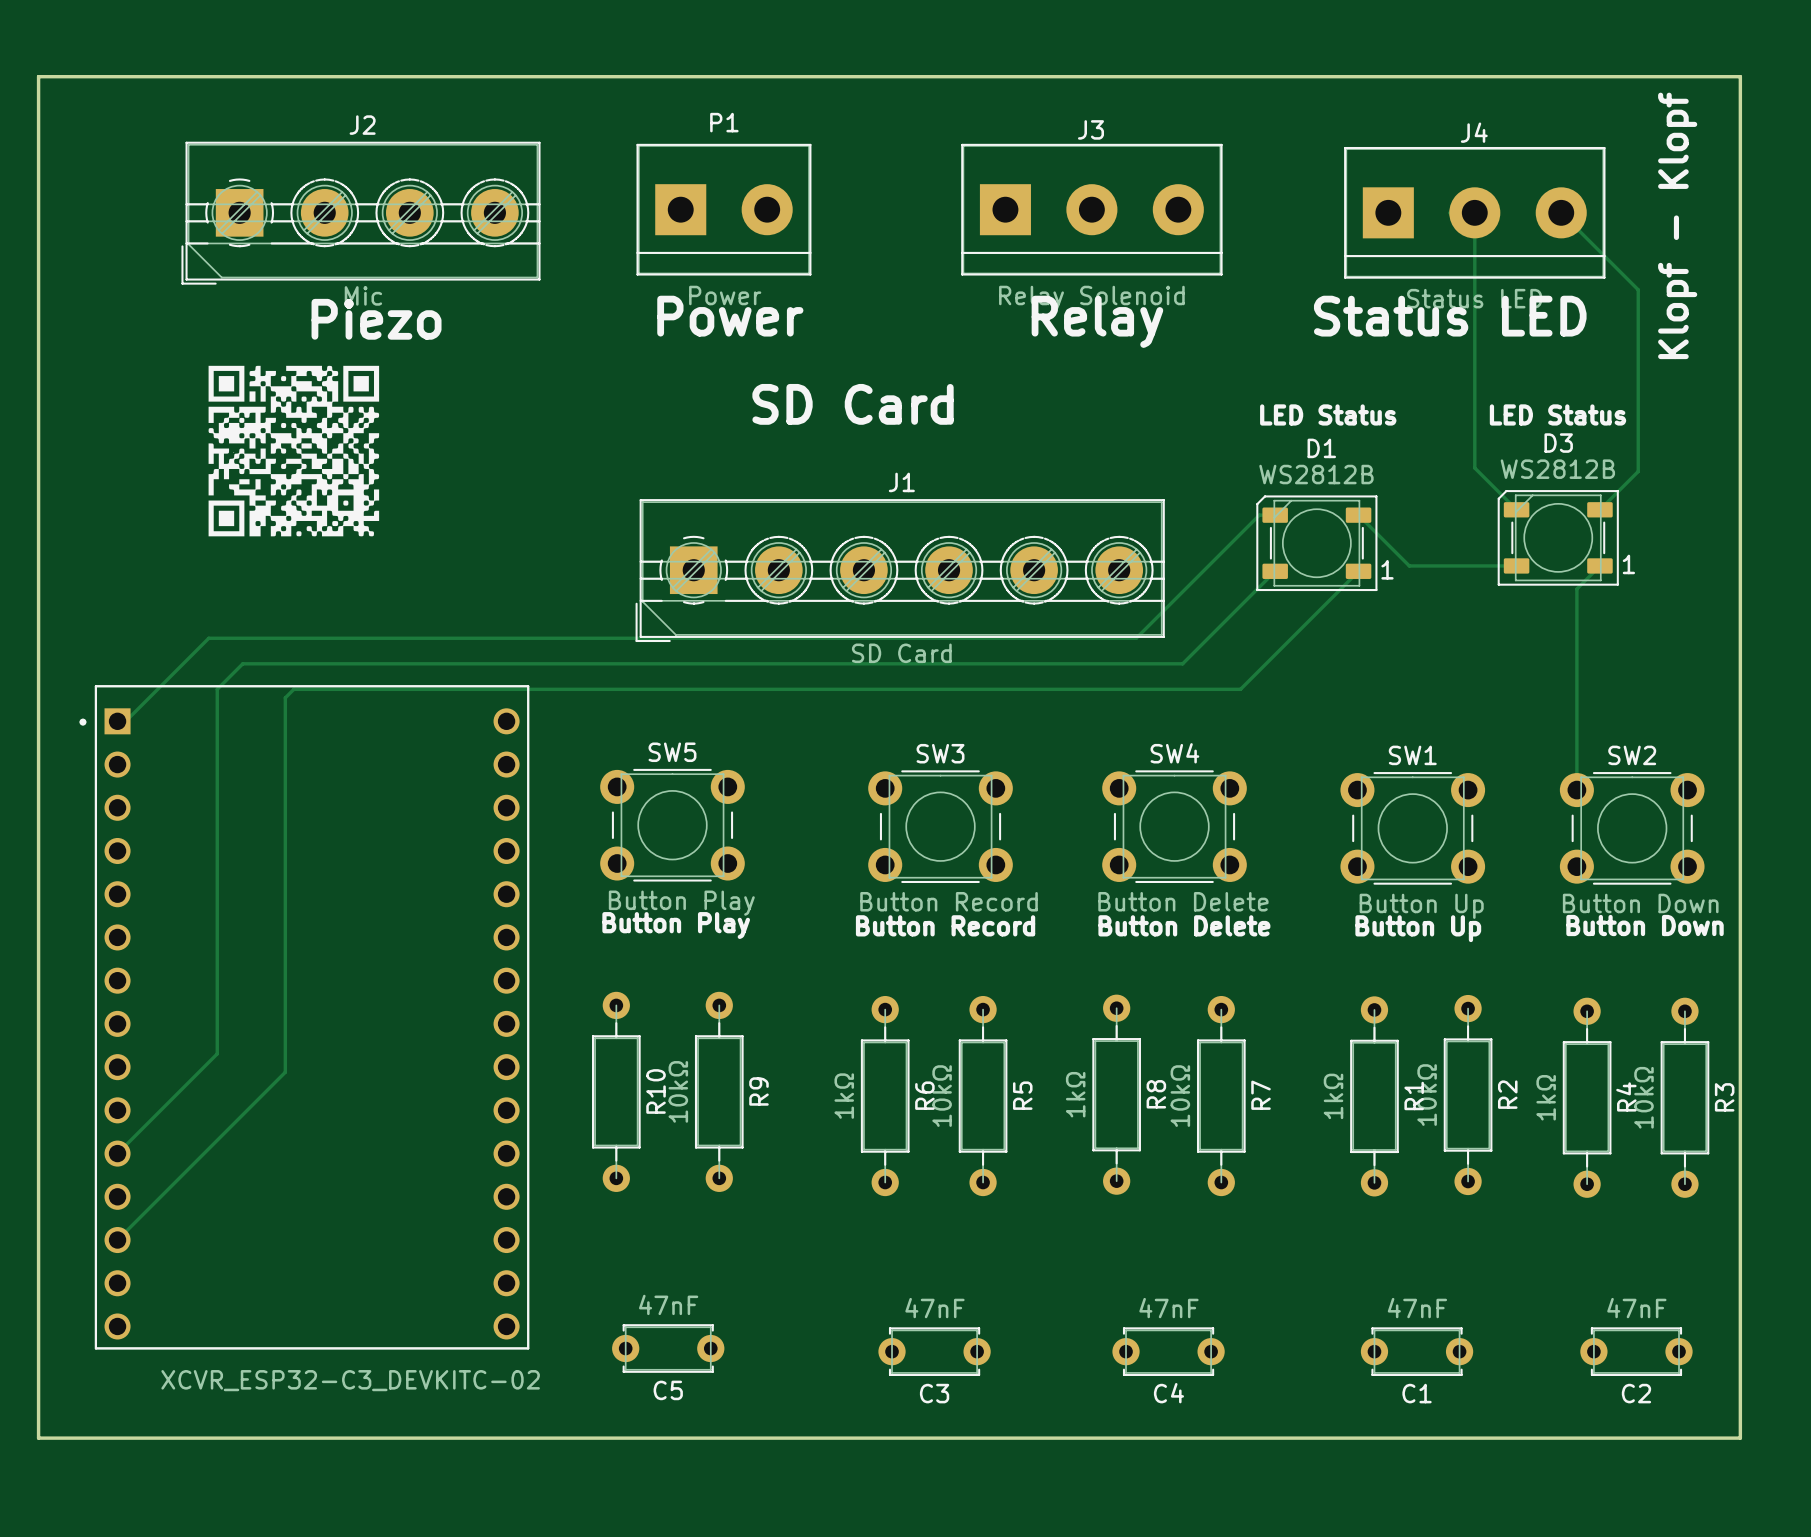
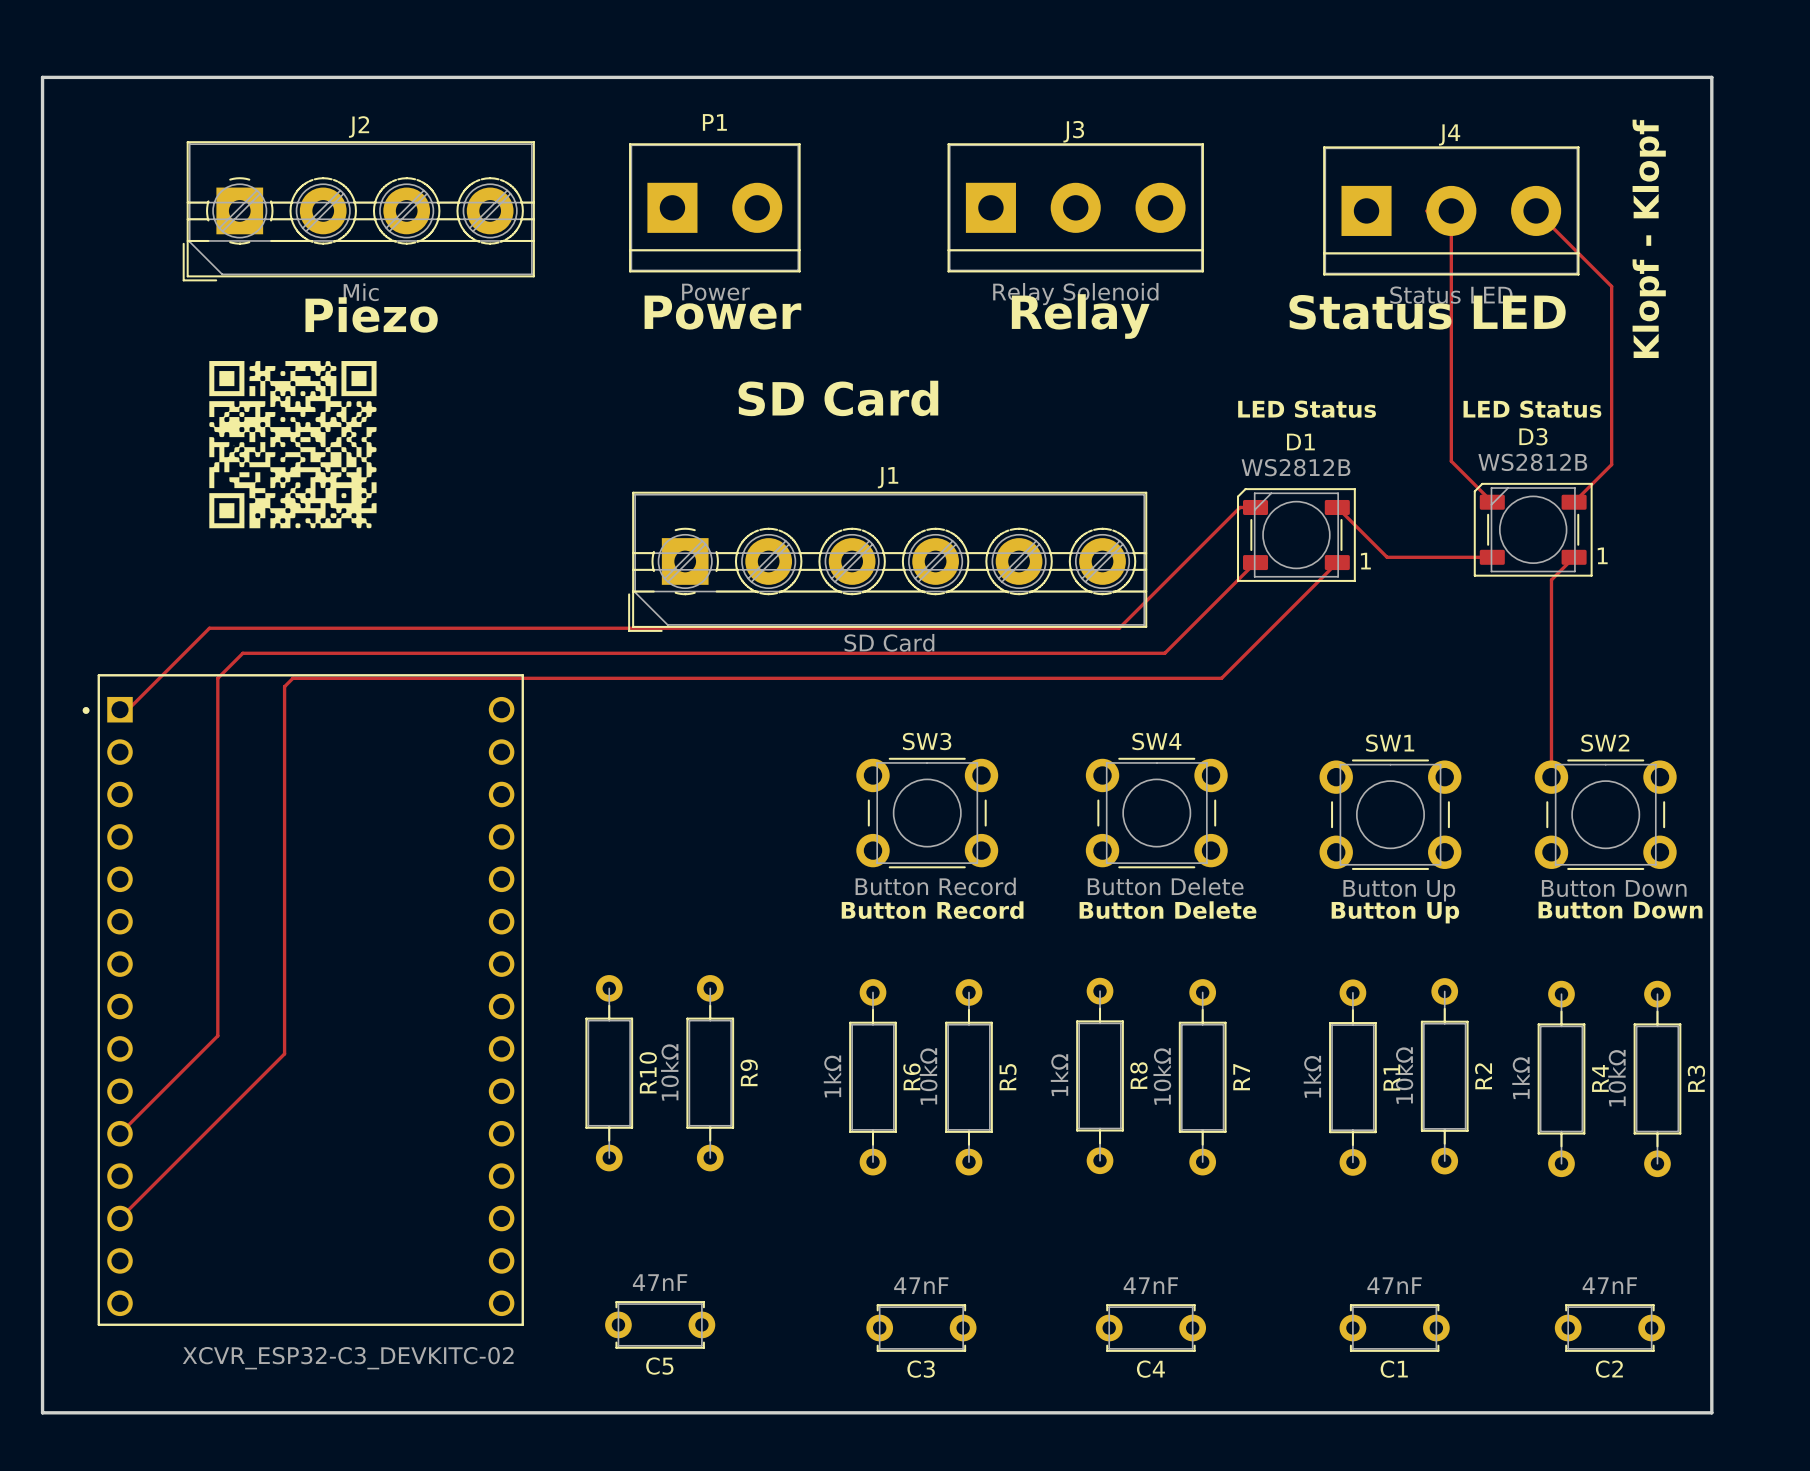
SW5: Button Play (672, 825) -> none
text: Button Play (676, 925) -> none

